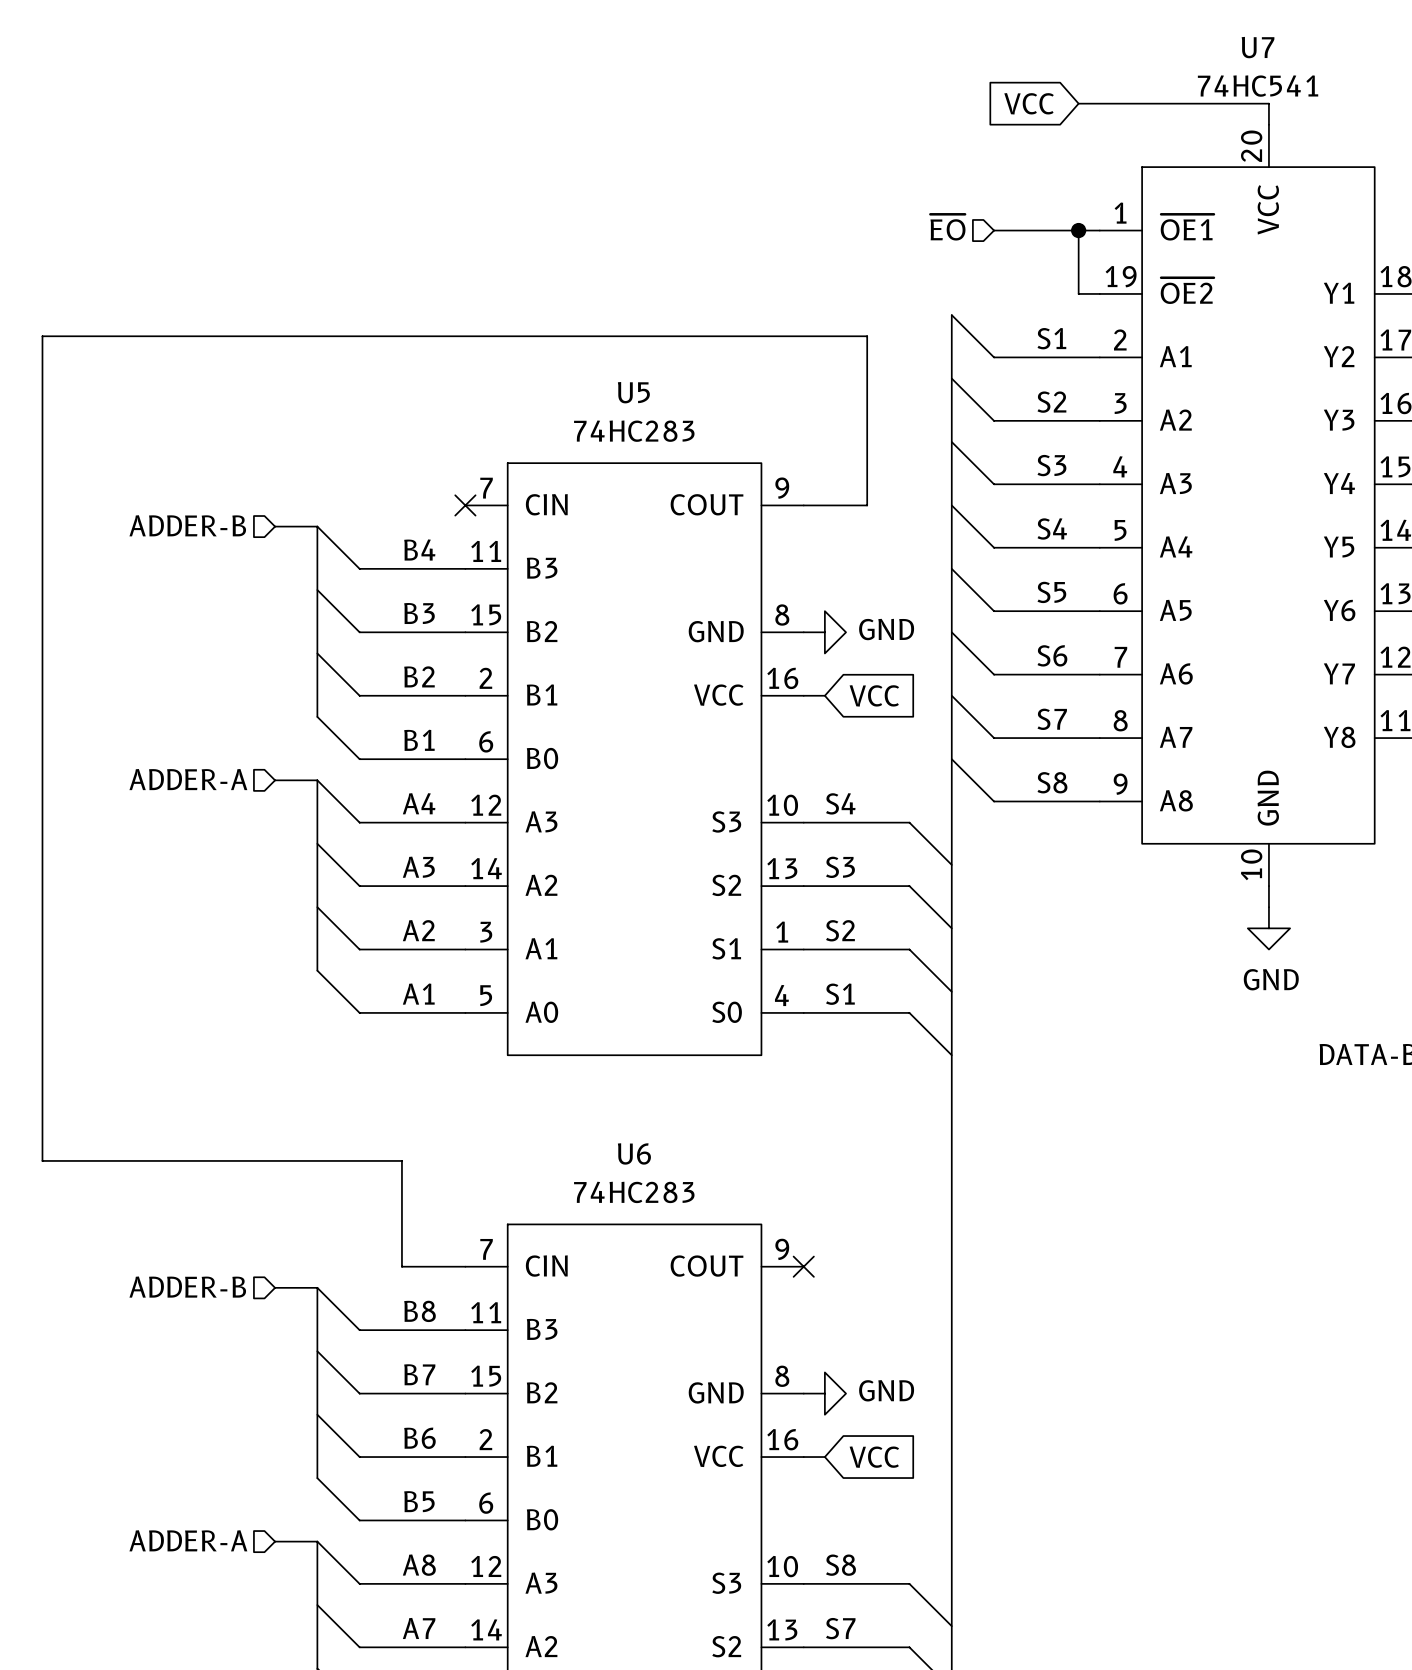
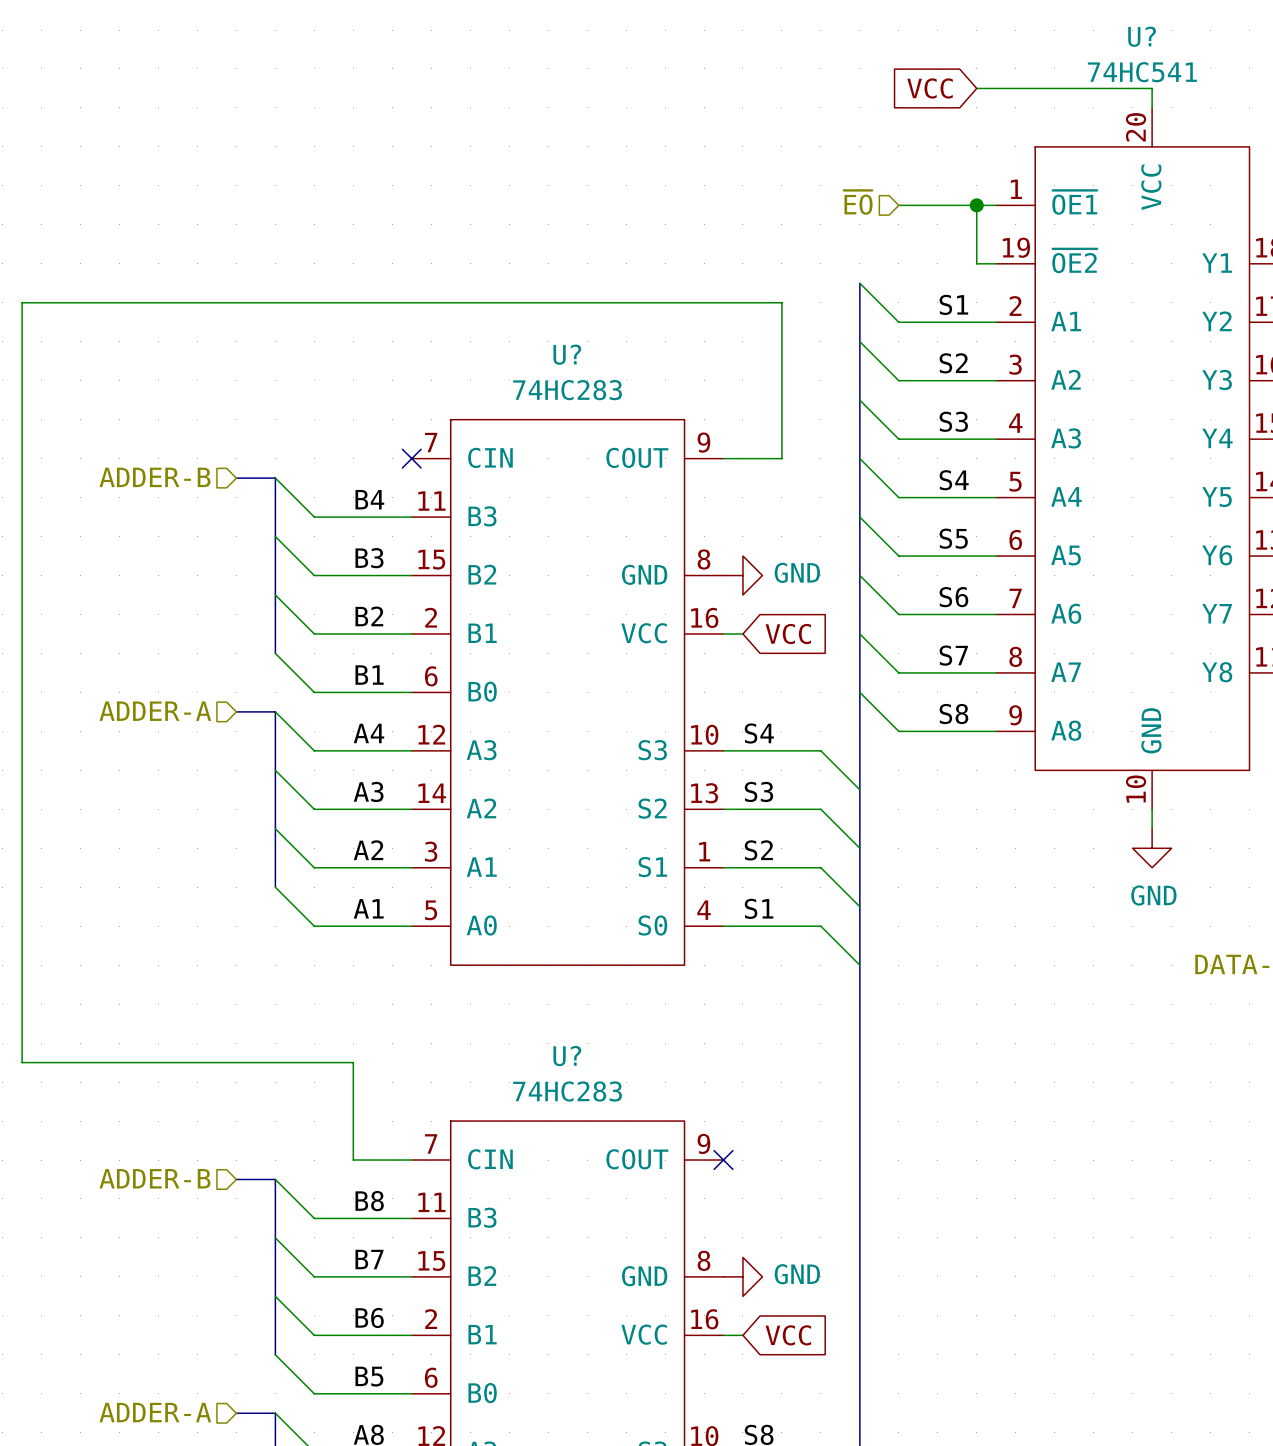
U7 name: U7 (1258, 47) -> U? (1142, 36)
U5 name: U5 (633, 392) -> U? (567, 354)
U6 name: U6 (634, 1153) -> U? (567, 1056)

